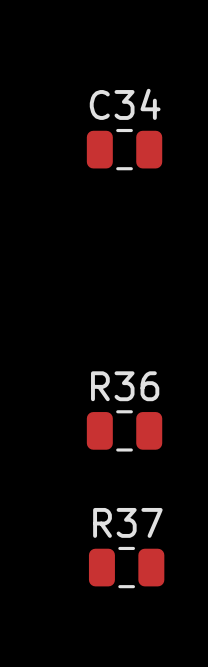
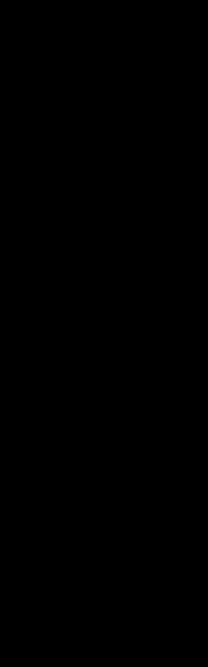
C34: (124, 149) -> none
R36: (124, 430) -> none
R37: (126, 567) -> none

